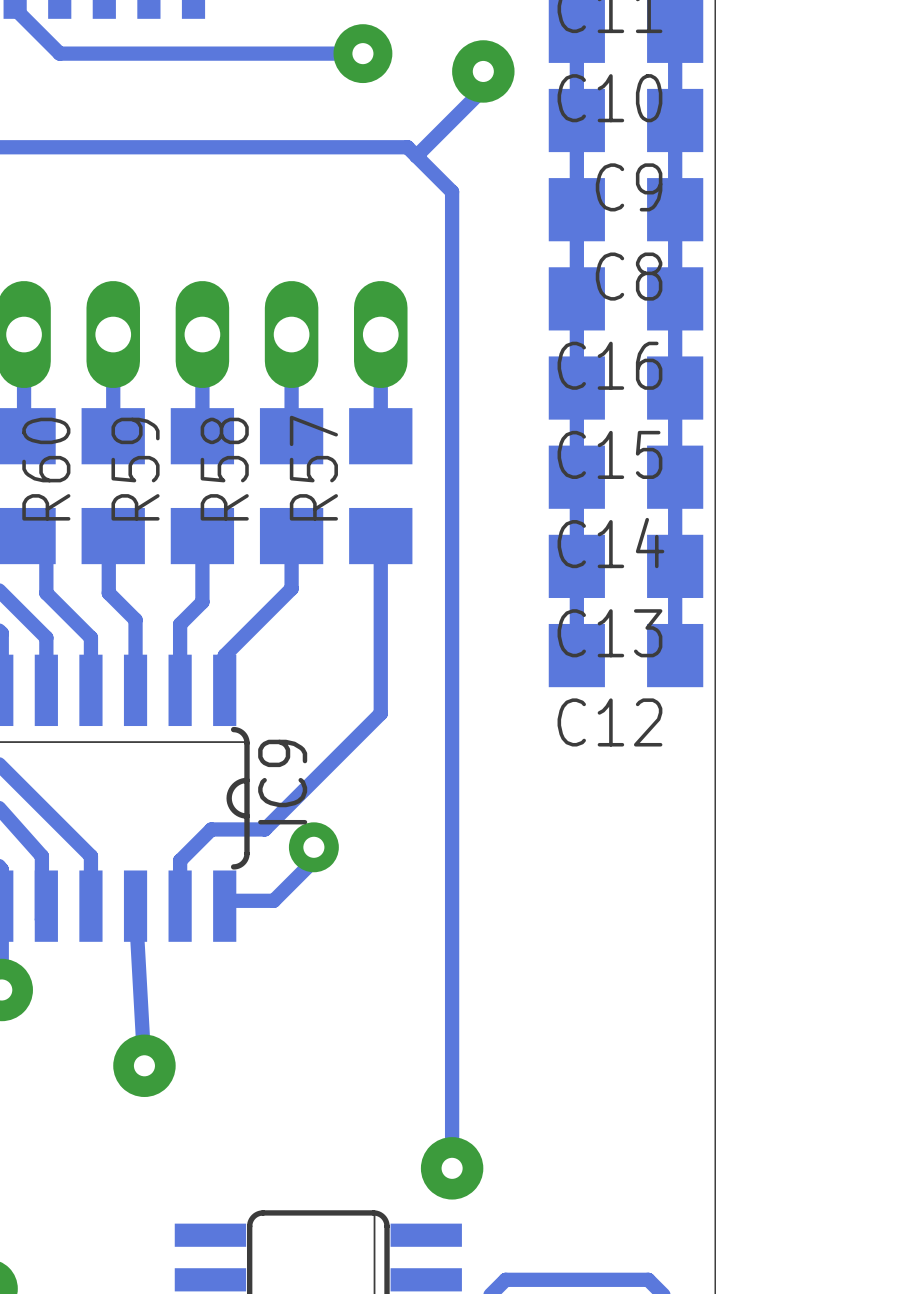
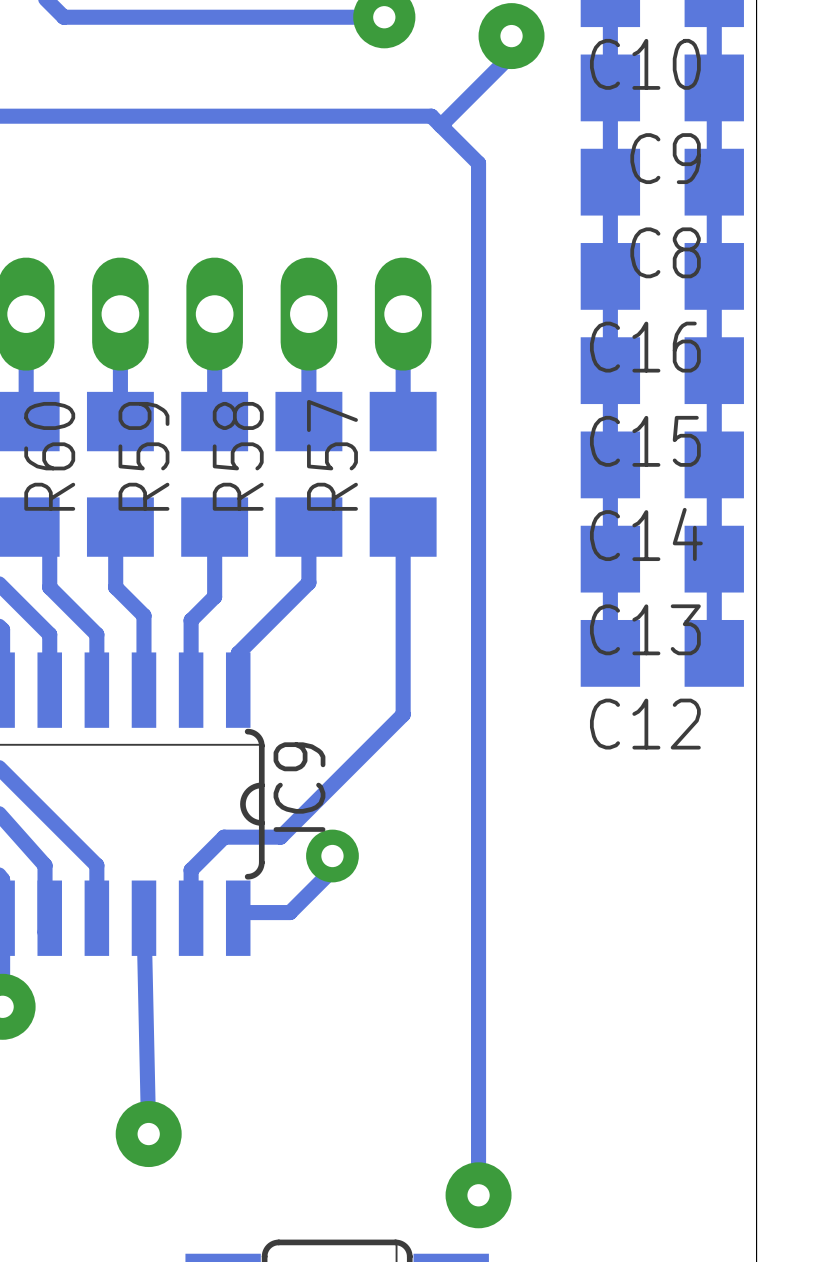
track: (135, 906) (144, 1065) -> (143, 918) (148, 1134)
via position: (144, 1065) -> (148, 1134)

